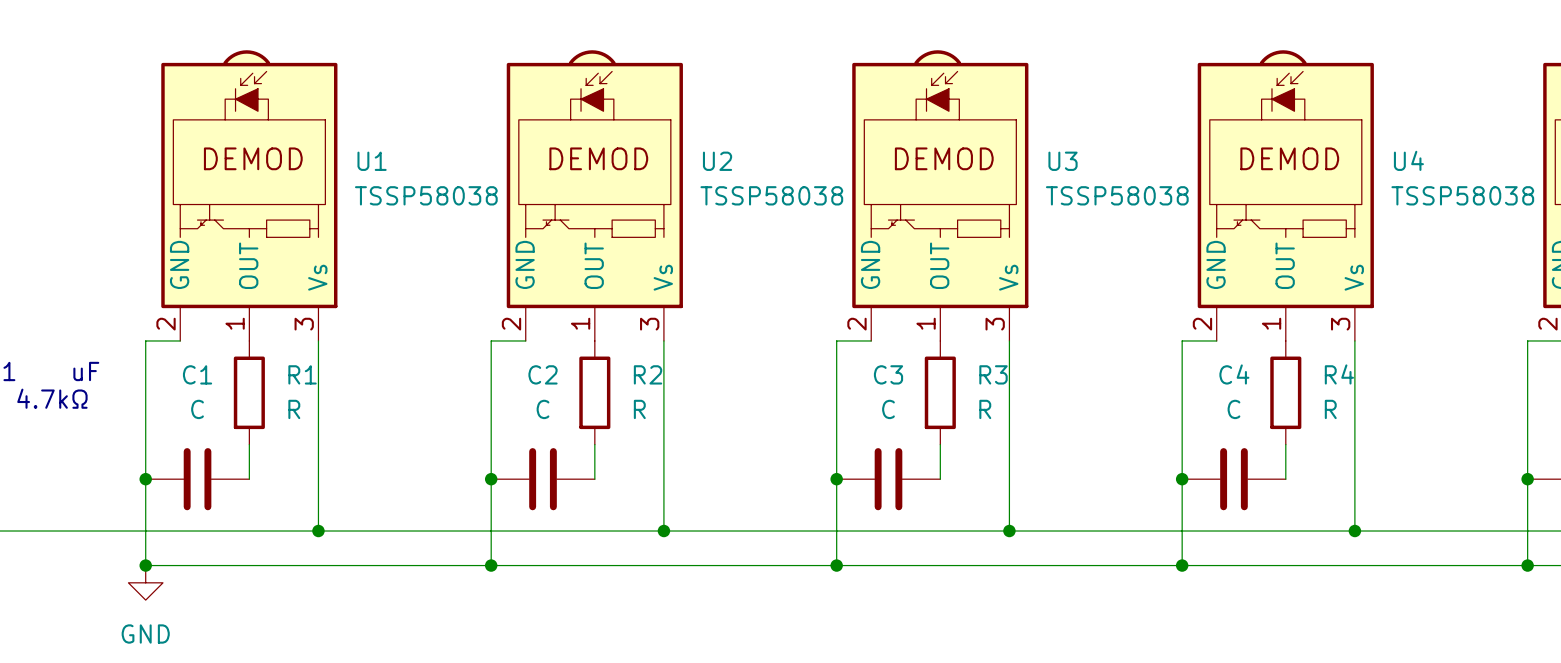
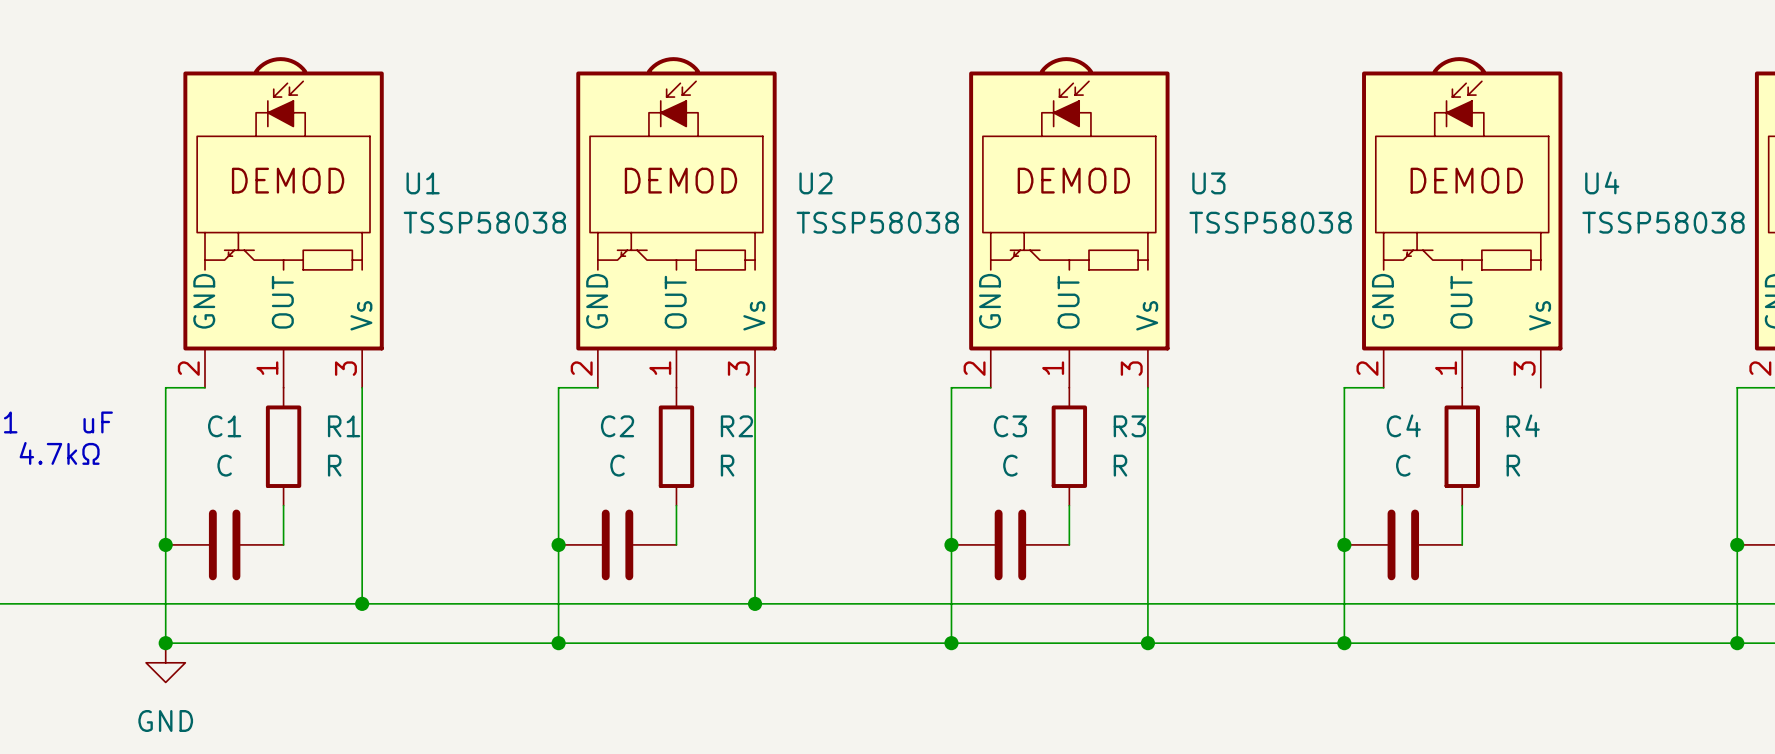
wire: (1354, 340) (1354, 531) -> none
wire: none -> (1147, 603) (1147, 643)
junction position: (1009, 531) -> (1147, 643)
junction: (1354, 531) -> none

